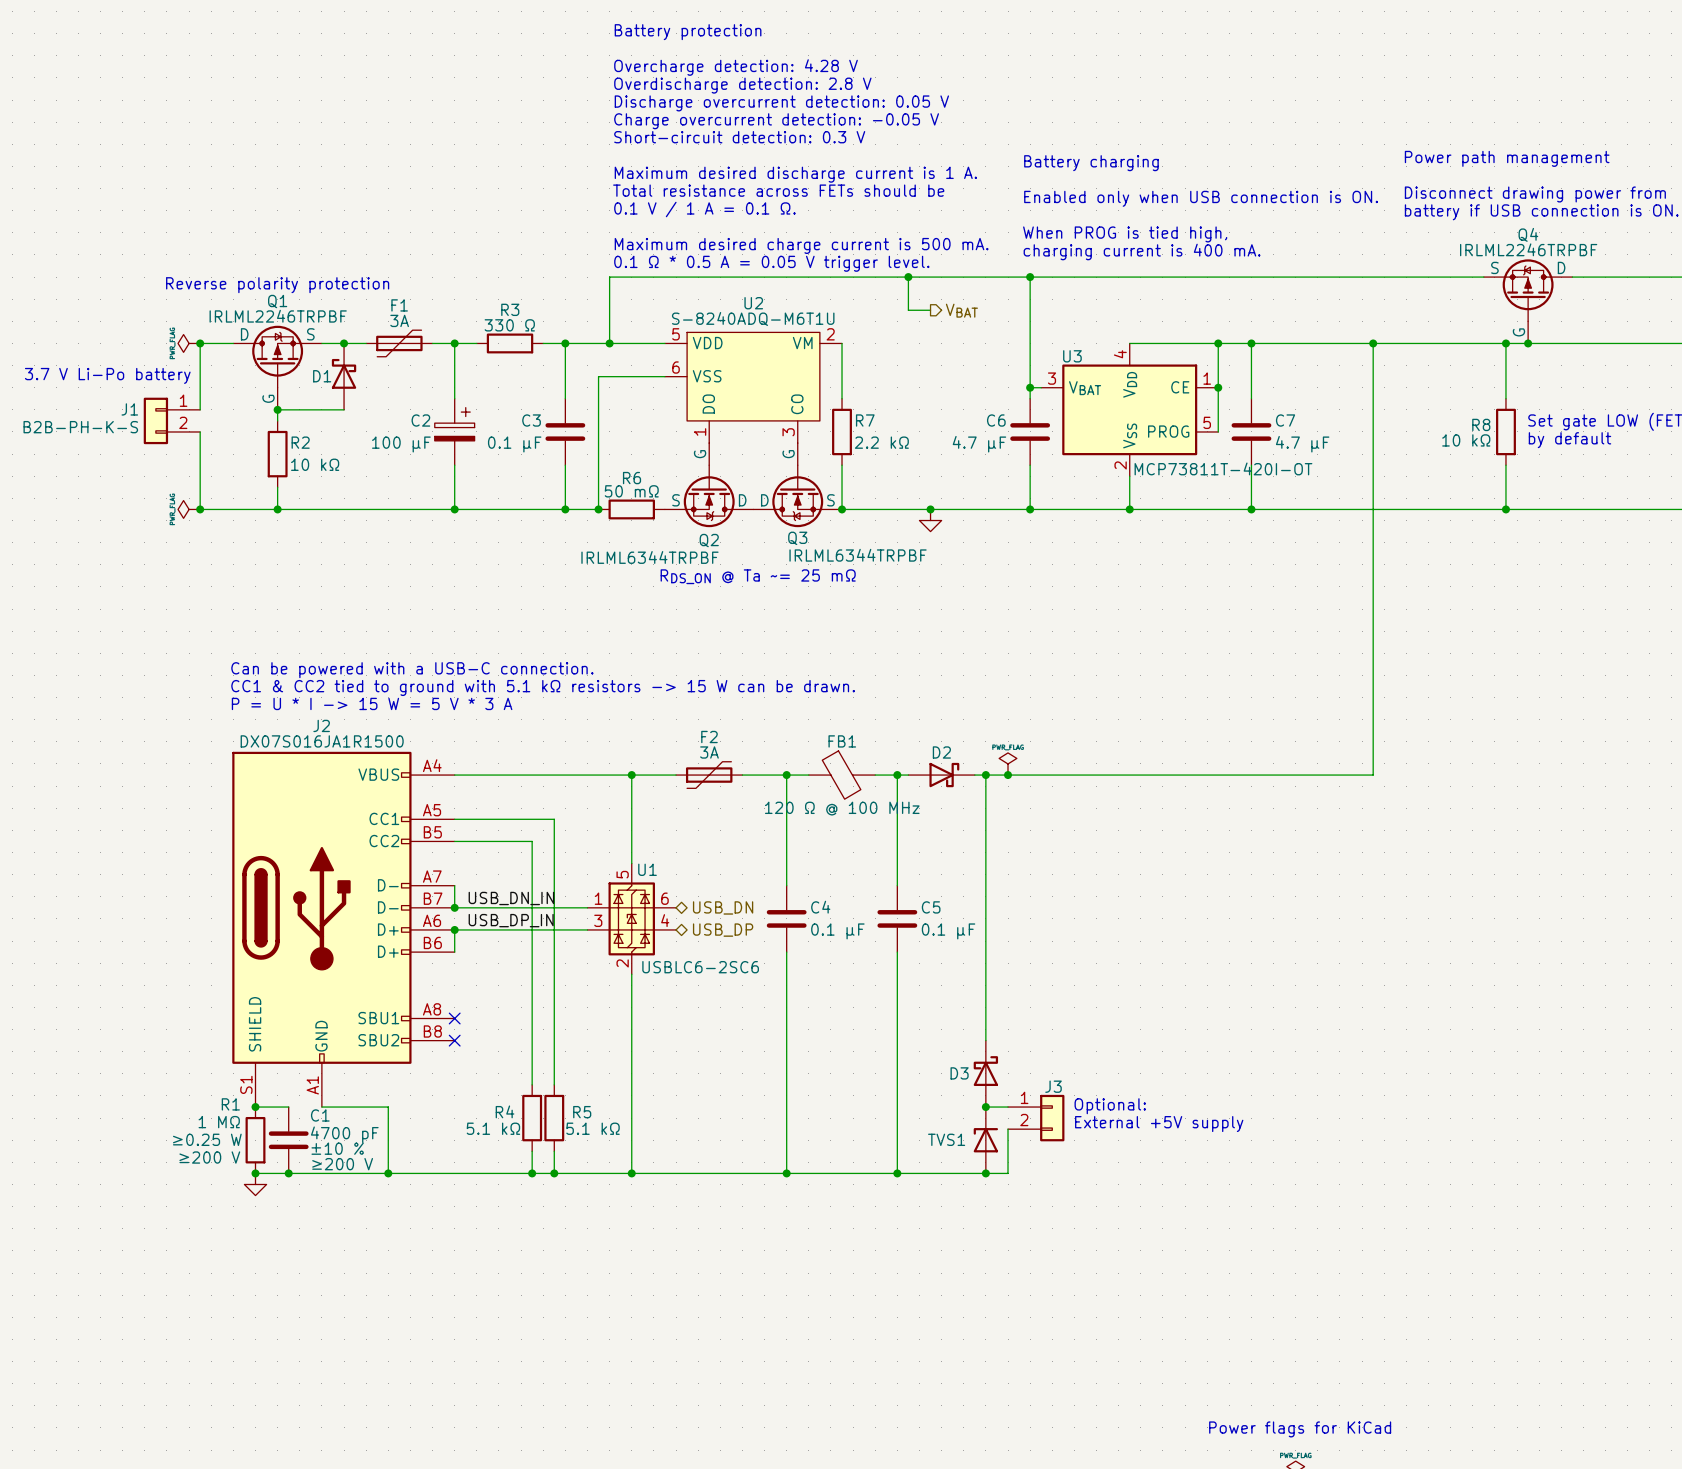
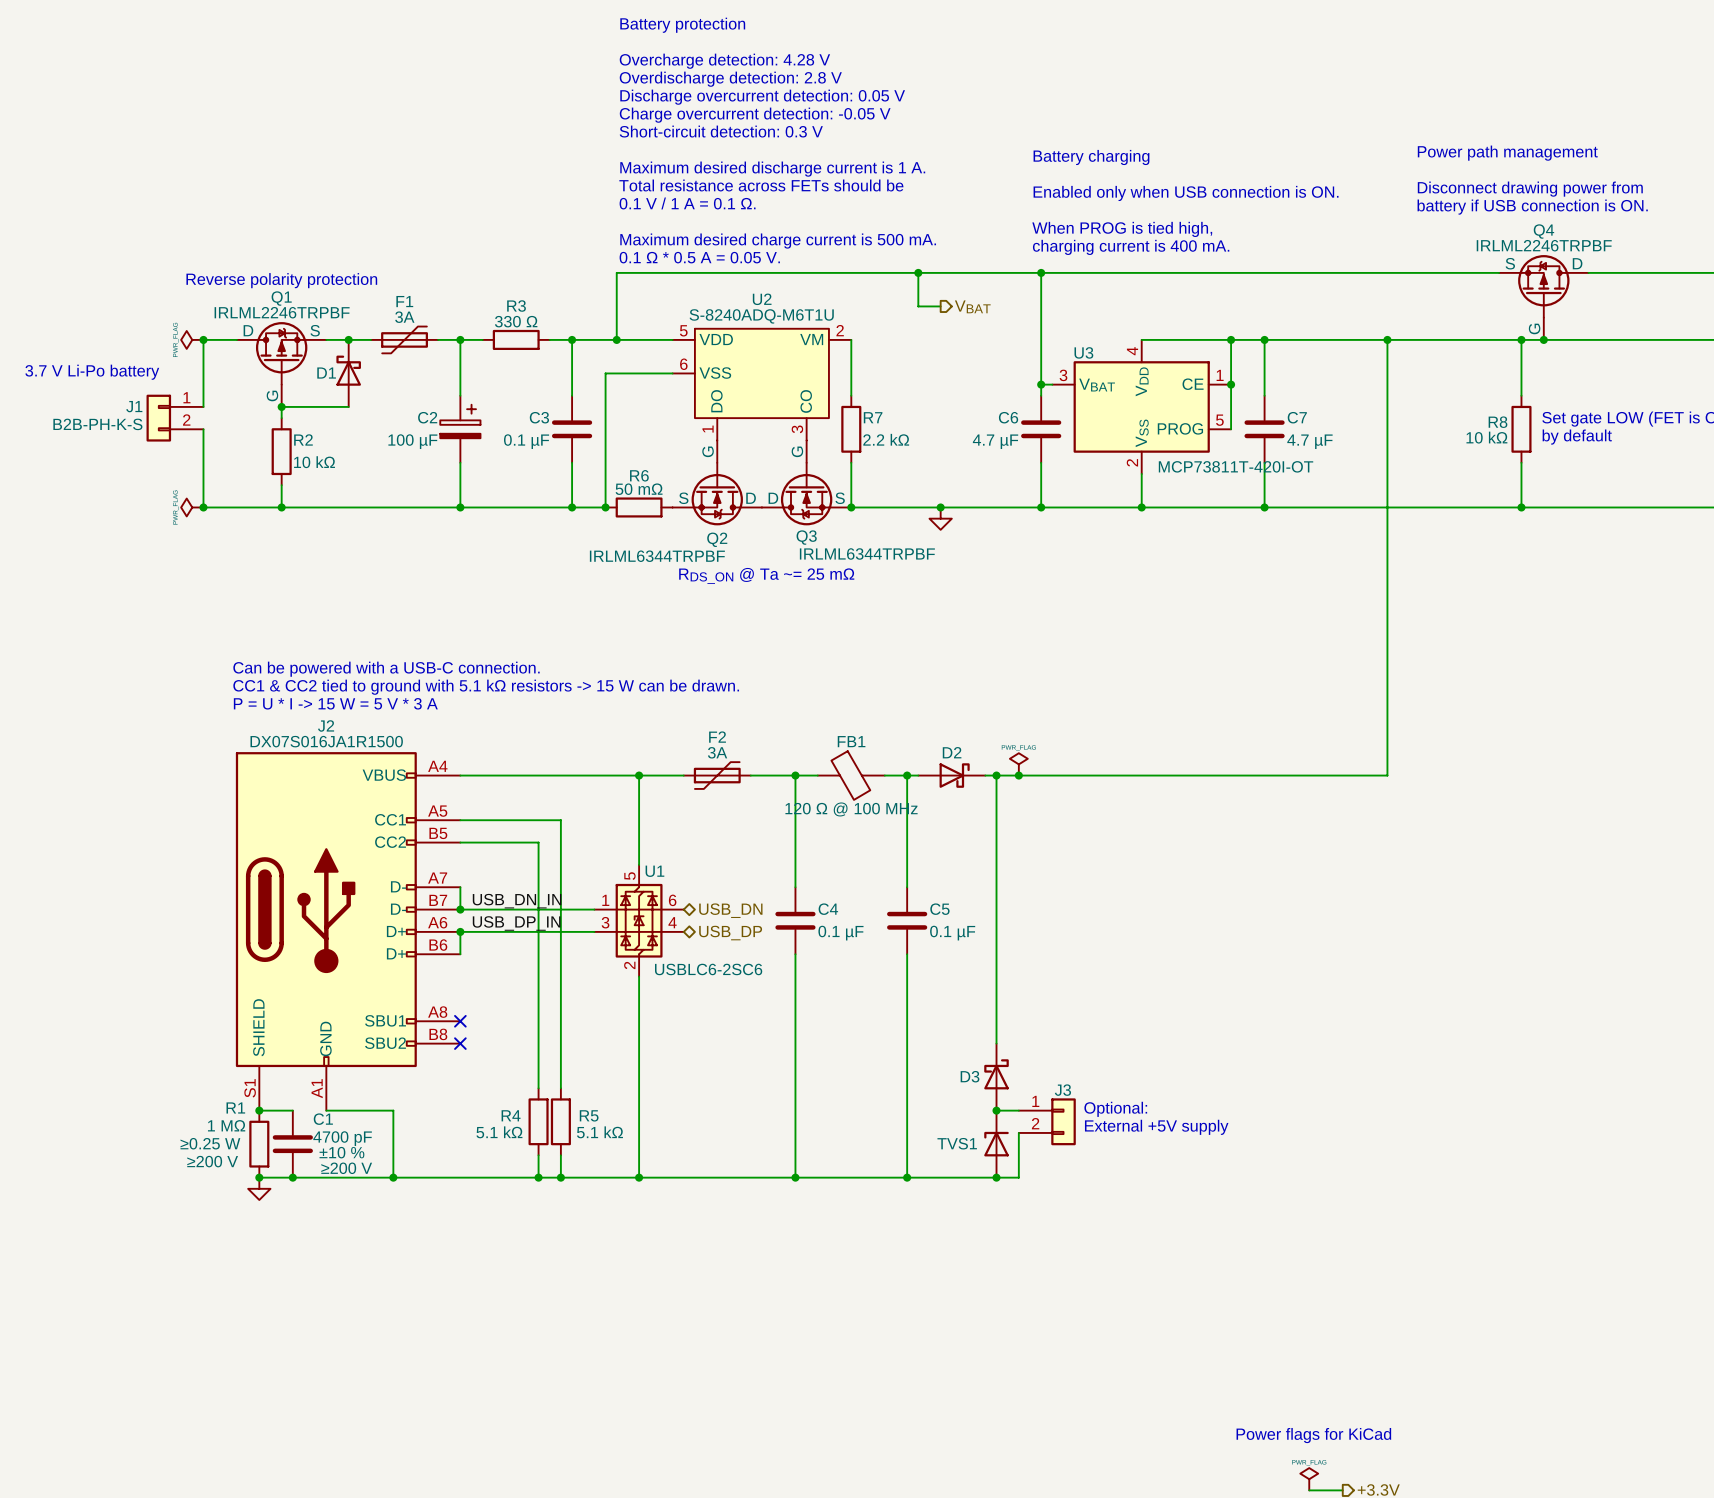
text: 0.1 Ω * 0.5 A = 0.05 V trigger level. (771, 263) -> 0.1 Ω * 0.5 A = 0.05 V. (699, 257)

